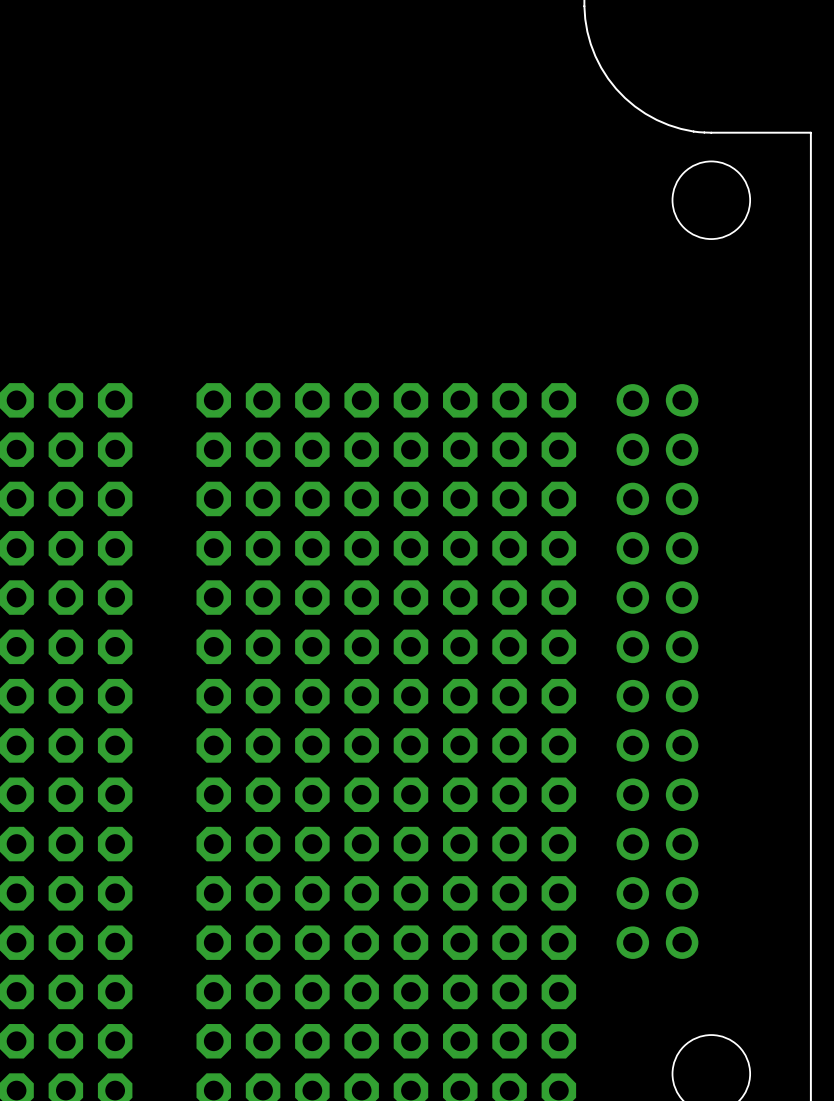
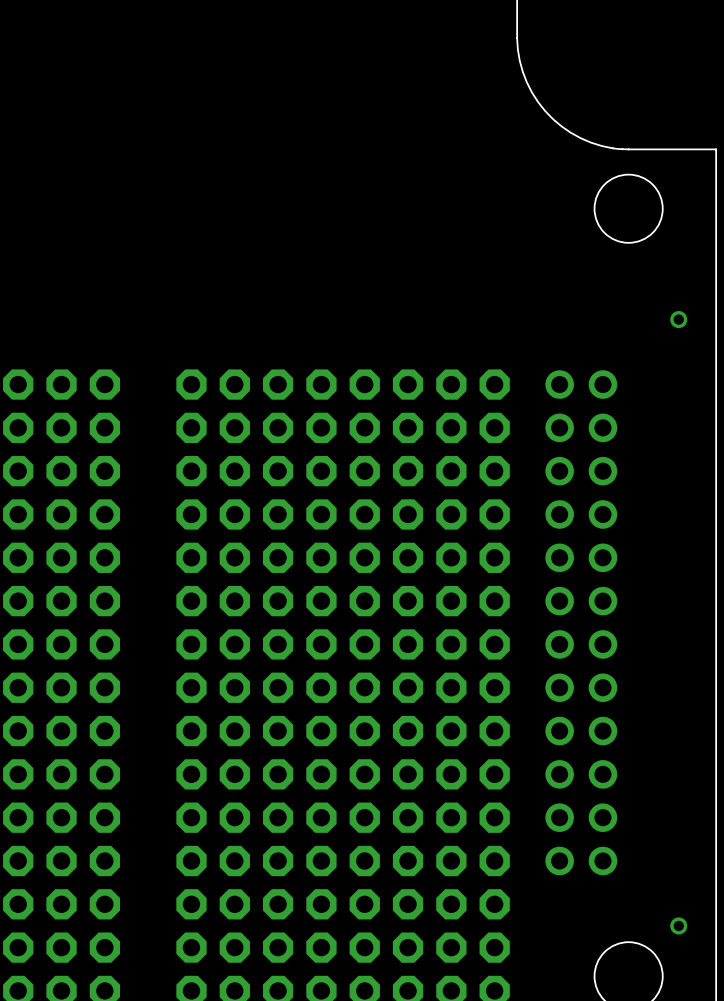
via: none -> (678, 319)
via: none -> (678, 925)

